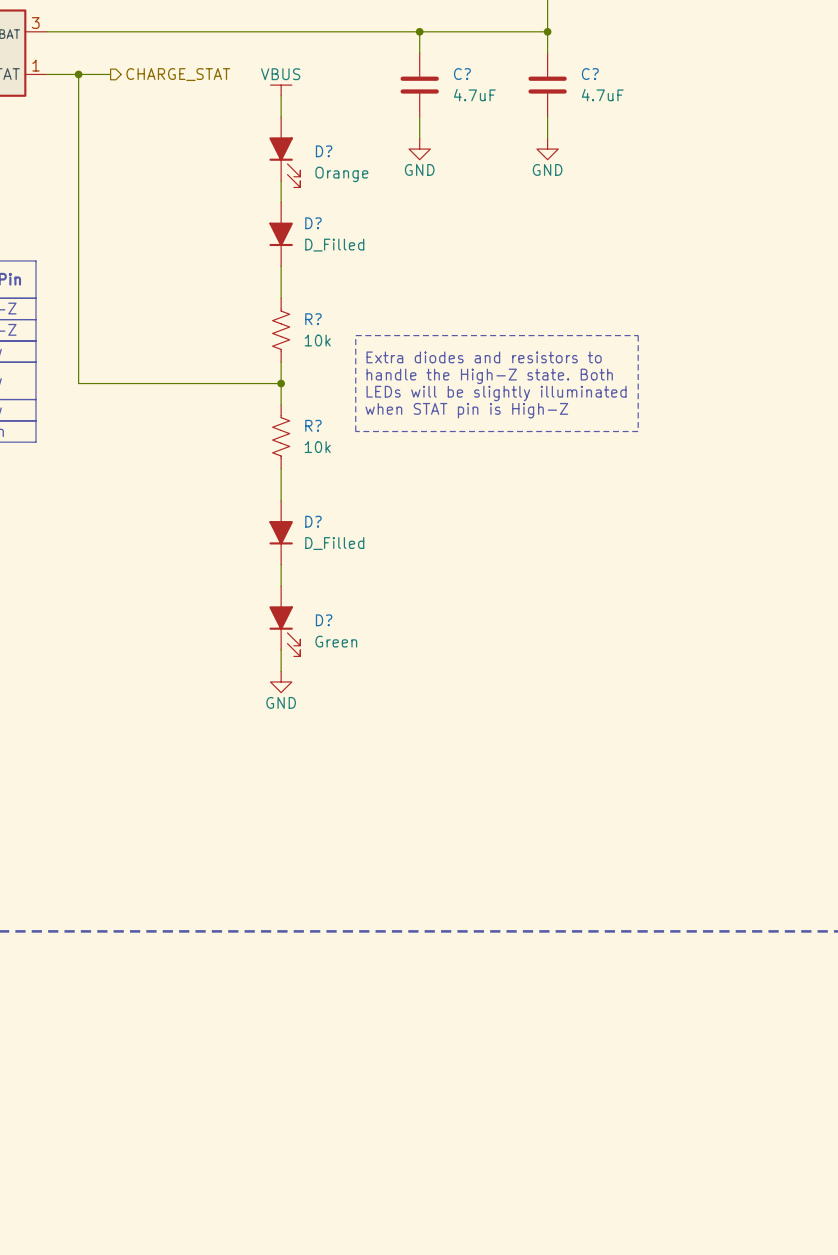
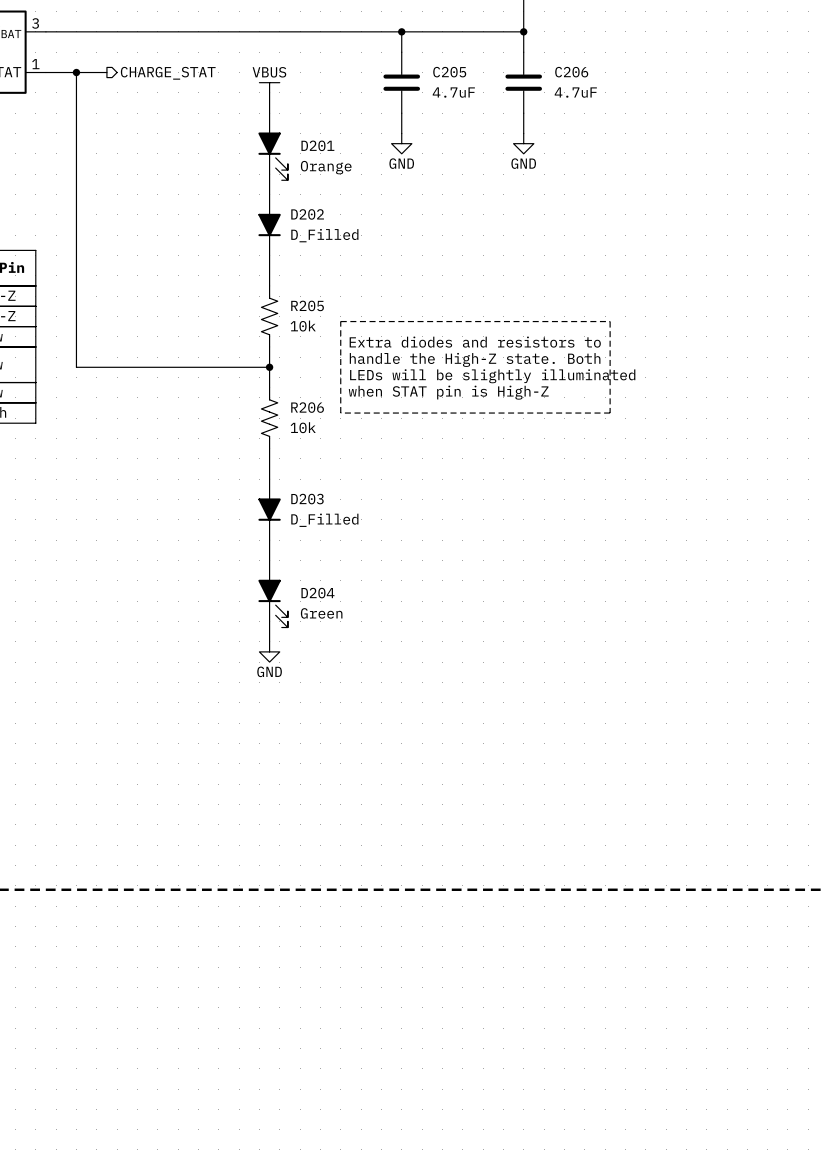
C? name: C? (462, 74) -> C205 (449, 72)
C? name: C? (590, 74) -> C206 (571, 72)
D? name: D? (324, 151) -> D201 (317, 145)
D? name: D? (313, 223) -> D202 (307, 214)
R? name: R? (313, 319) -> R205 (307, 305)
R? name: R? (313, 425) -> R206 (307, 407)
D? name: D? (313, 521) -> D203 (307, 499)
D? name: D? (324, 620) -> D204 (317, 593)

